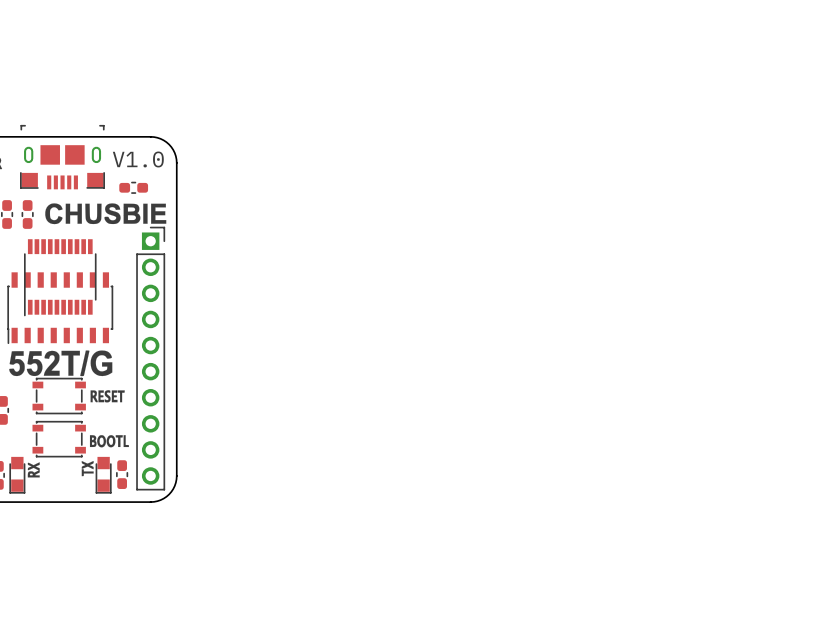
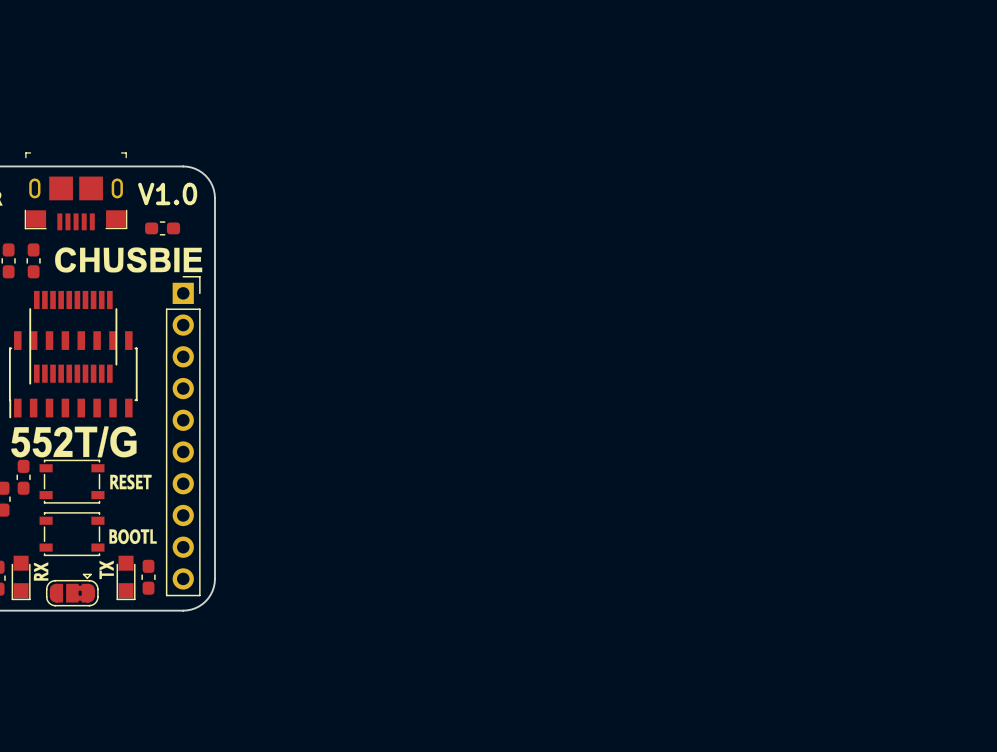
part: none -> (23, 477)
part: none -> (72, 590)

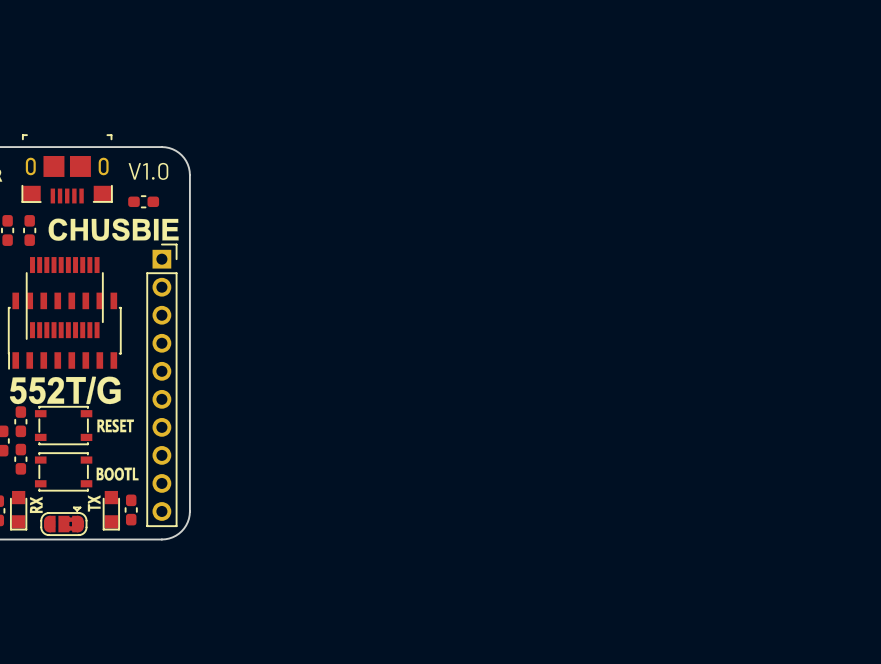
part: none -> (20, 459)

